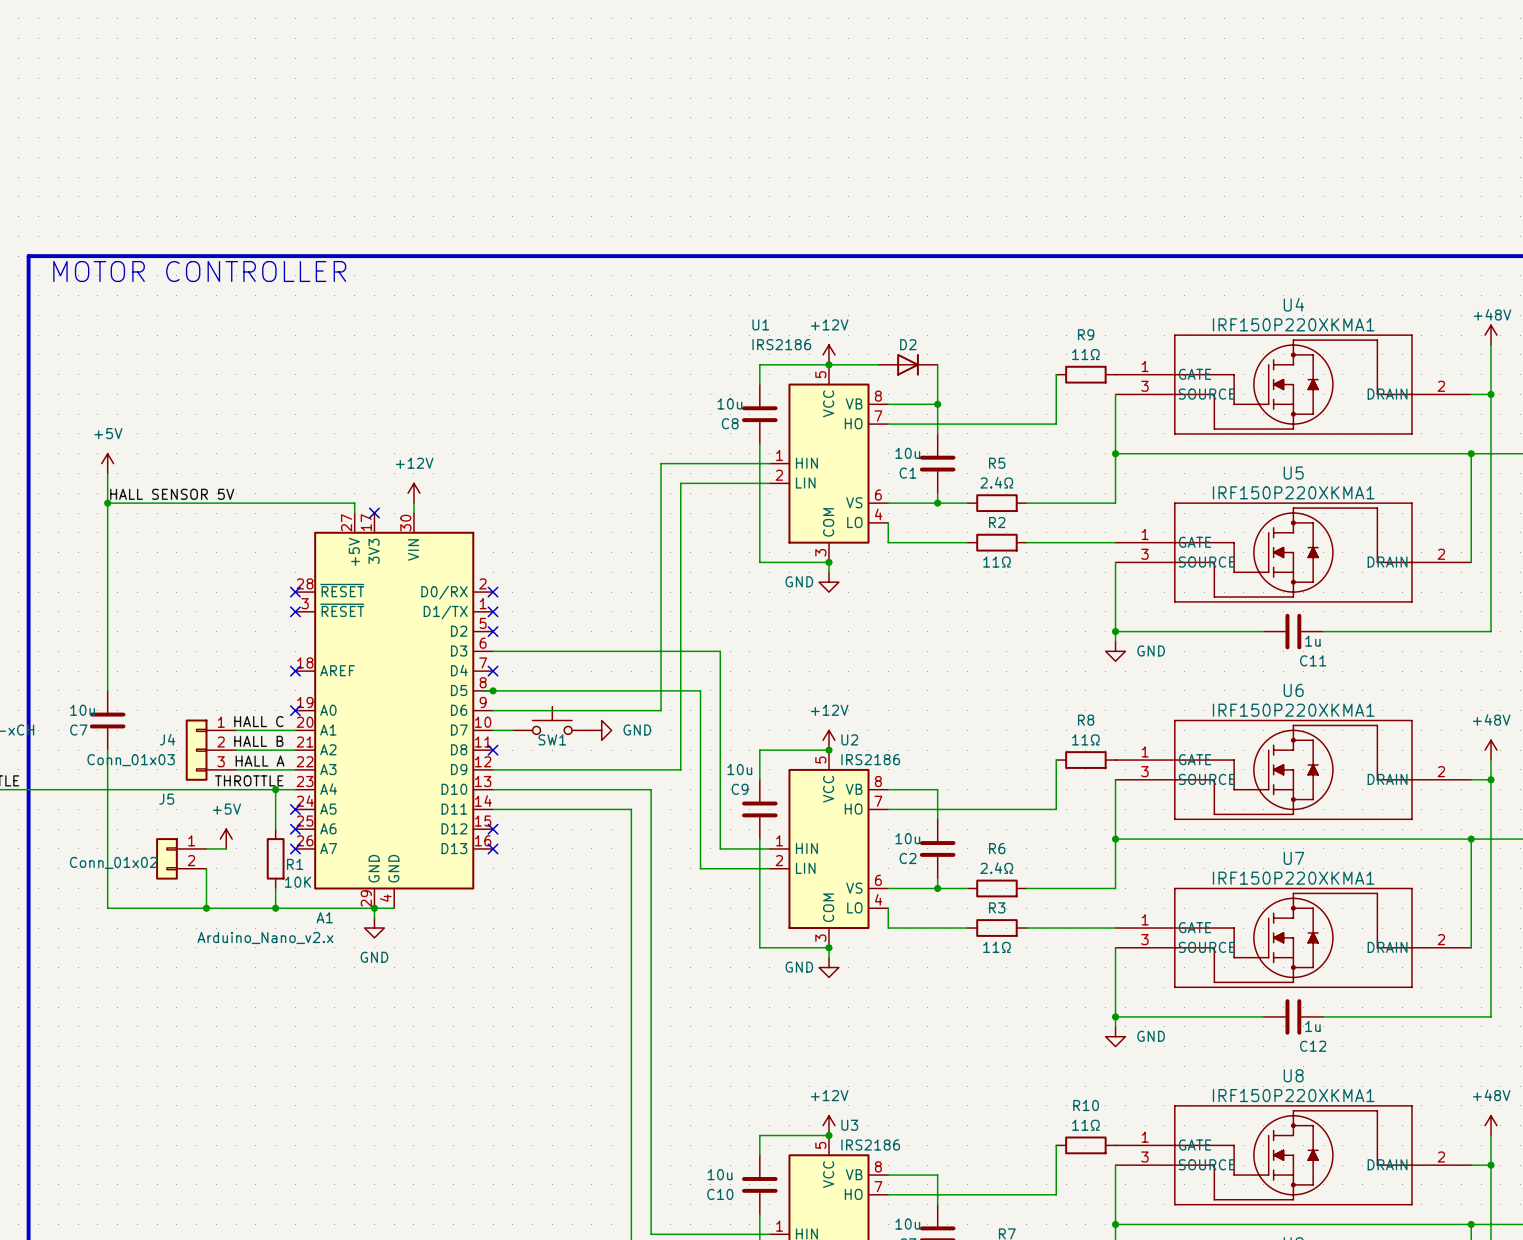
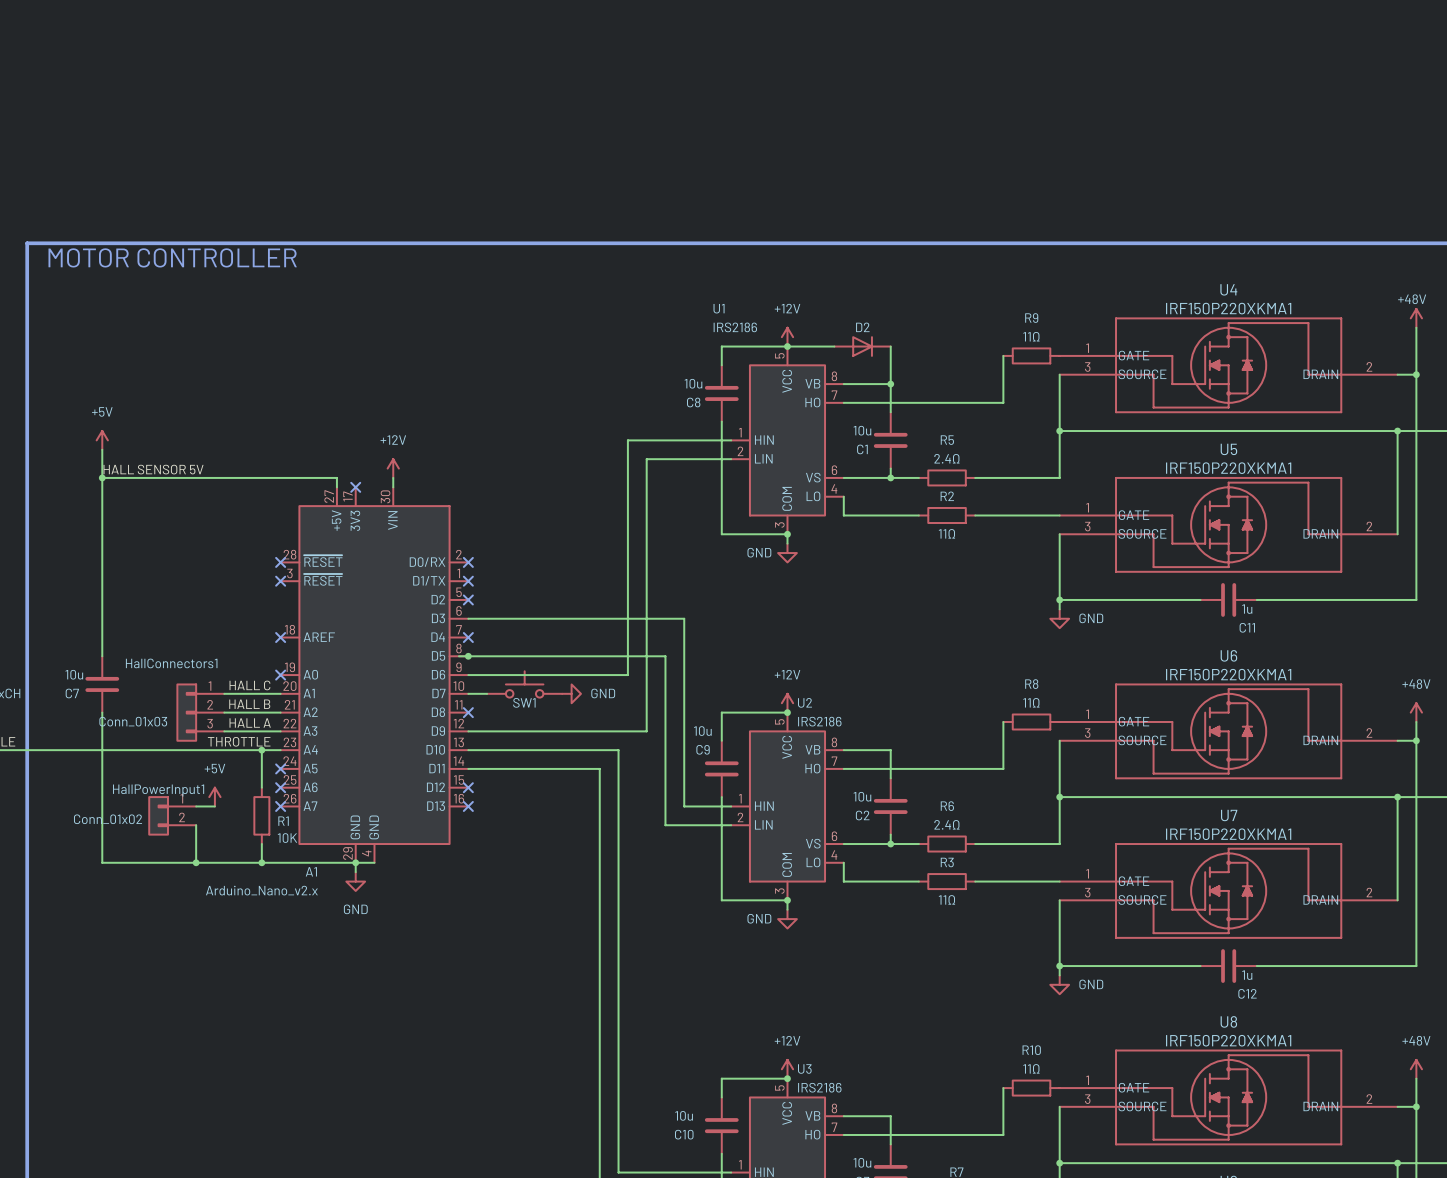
J4 name: J4 (167, 739) -> HallConnectors1 (171, 663)
J5 name: J5 (166, 799) -> HallPowerInput1 (158, 790)

